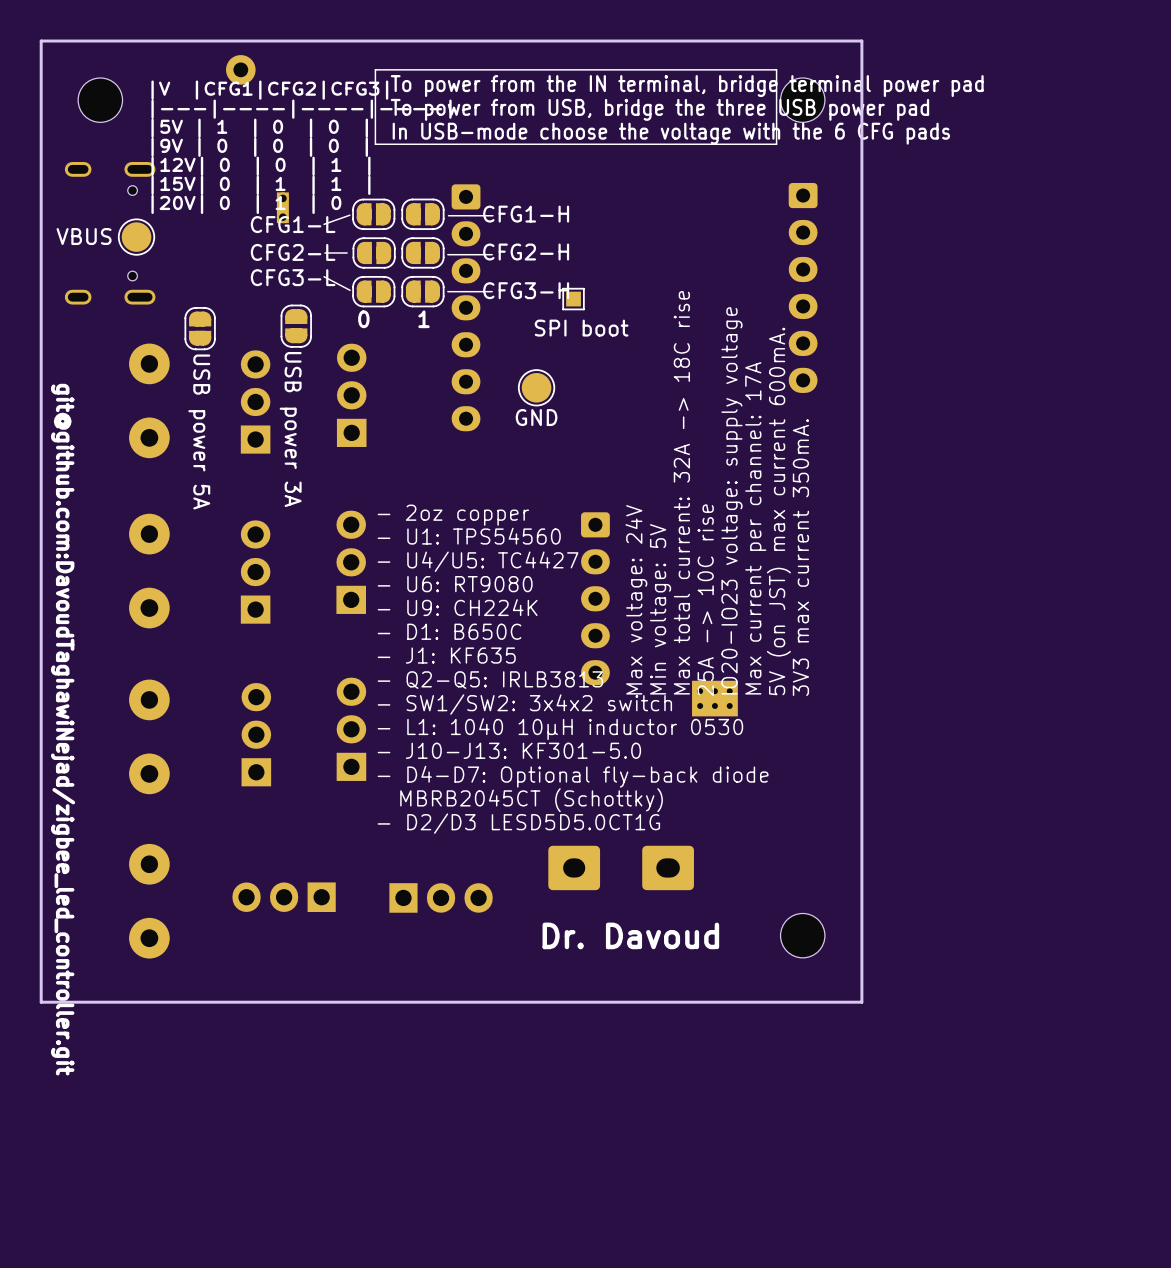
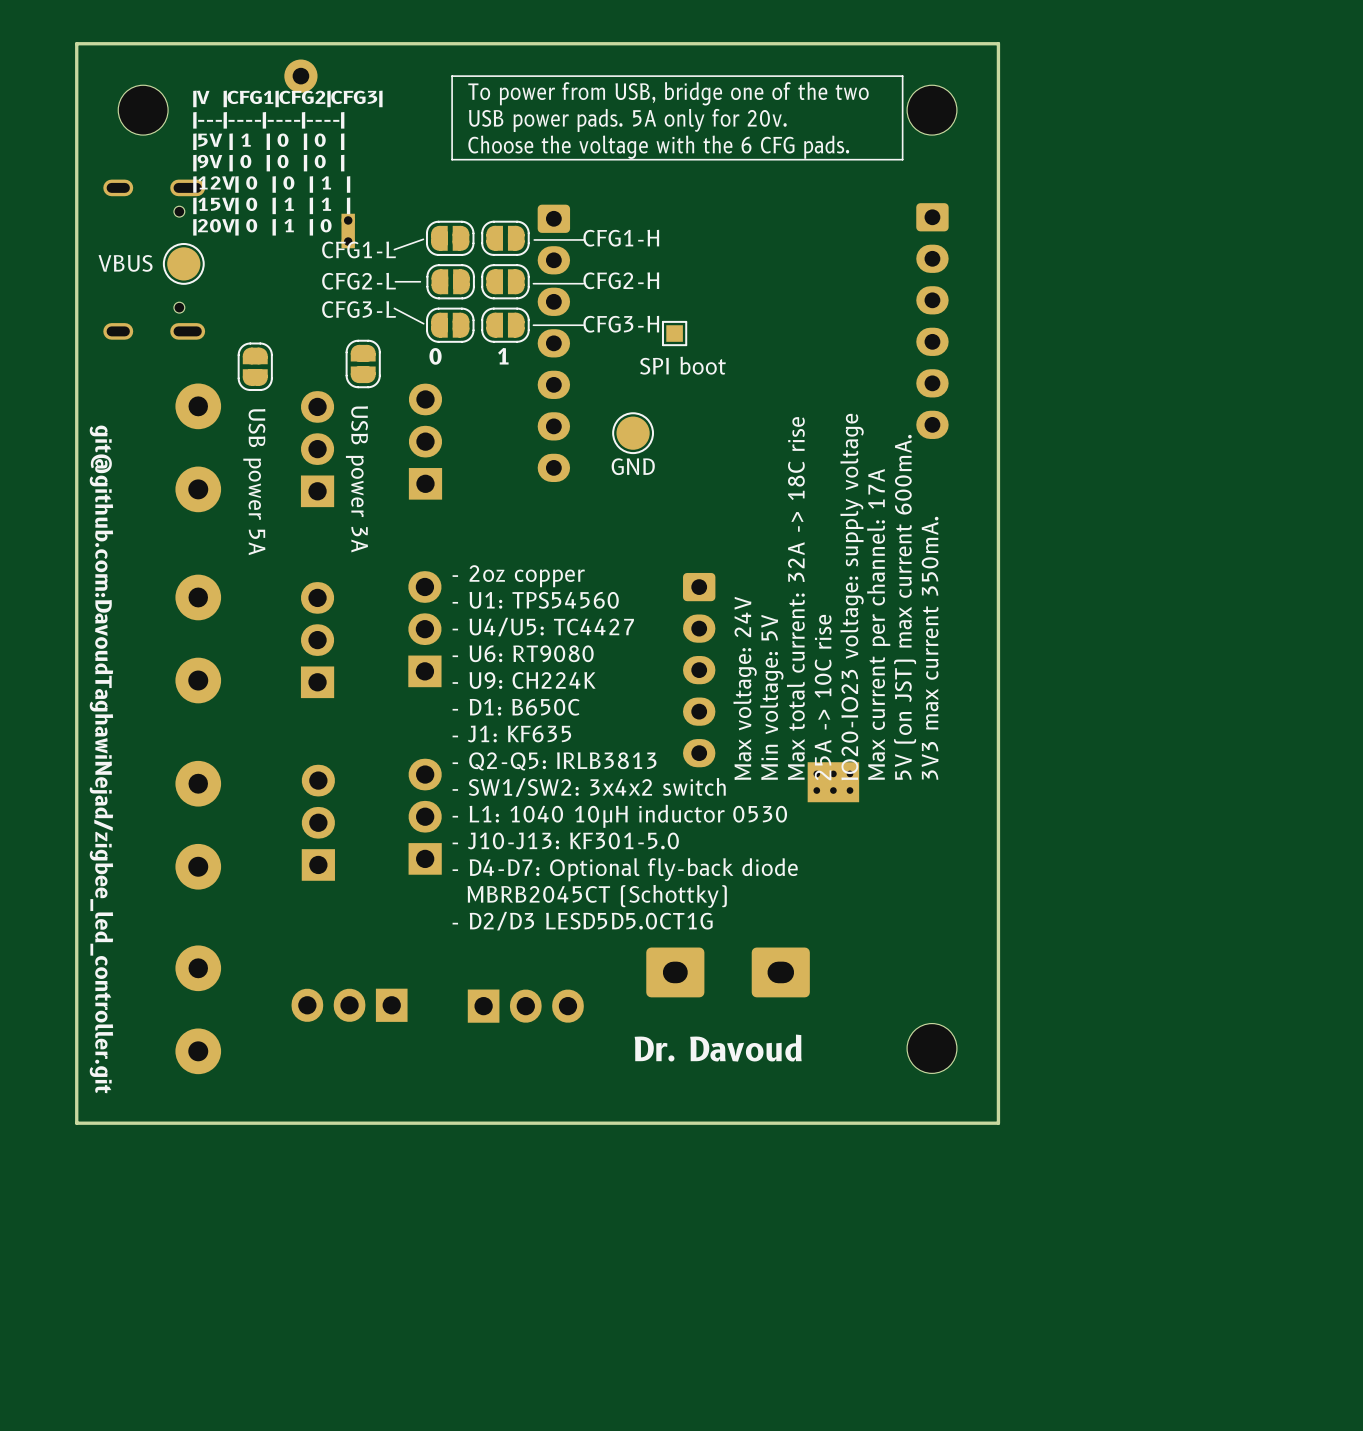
text: To power from the IN terminal, bridge terminal power pad (687, 86) -> To power from USB, bridge one of the two (668, 93)
text: To power from USB, bridge the three USB power pad (659, 109) -> USB power pads. 5A only for 20v. (627, 120)
text: In USB-mode choose the voltage with the 6 CFG pads (671, 133) -> Choose the voltage with the 6 CFG pads. (658, 147)

